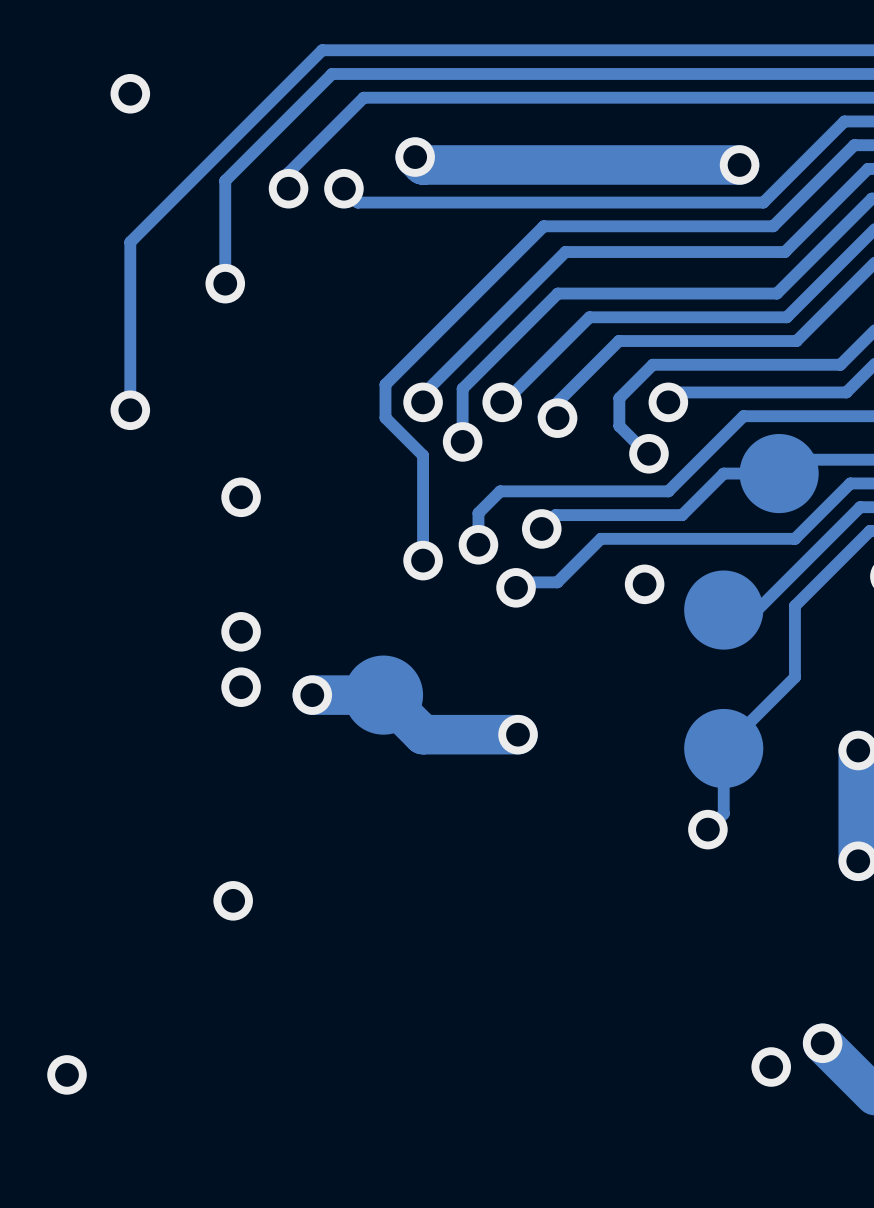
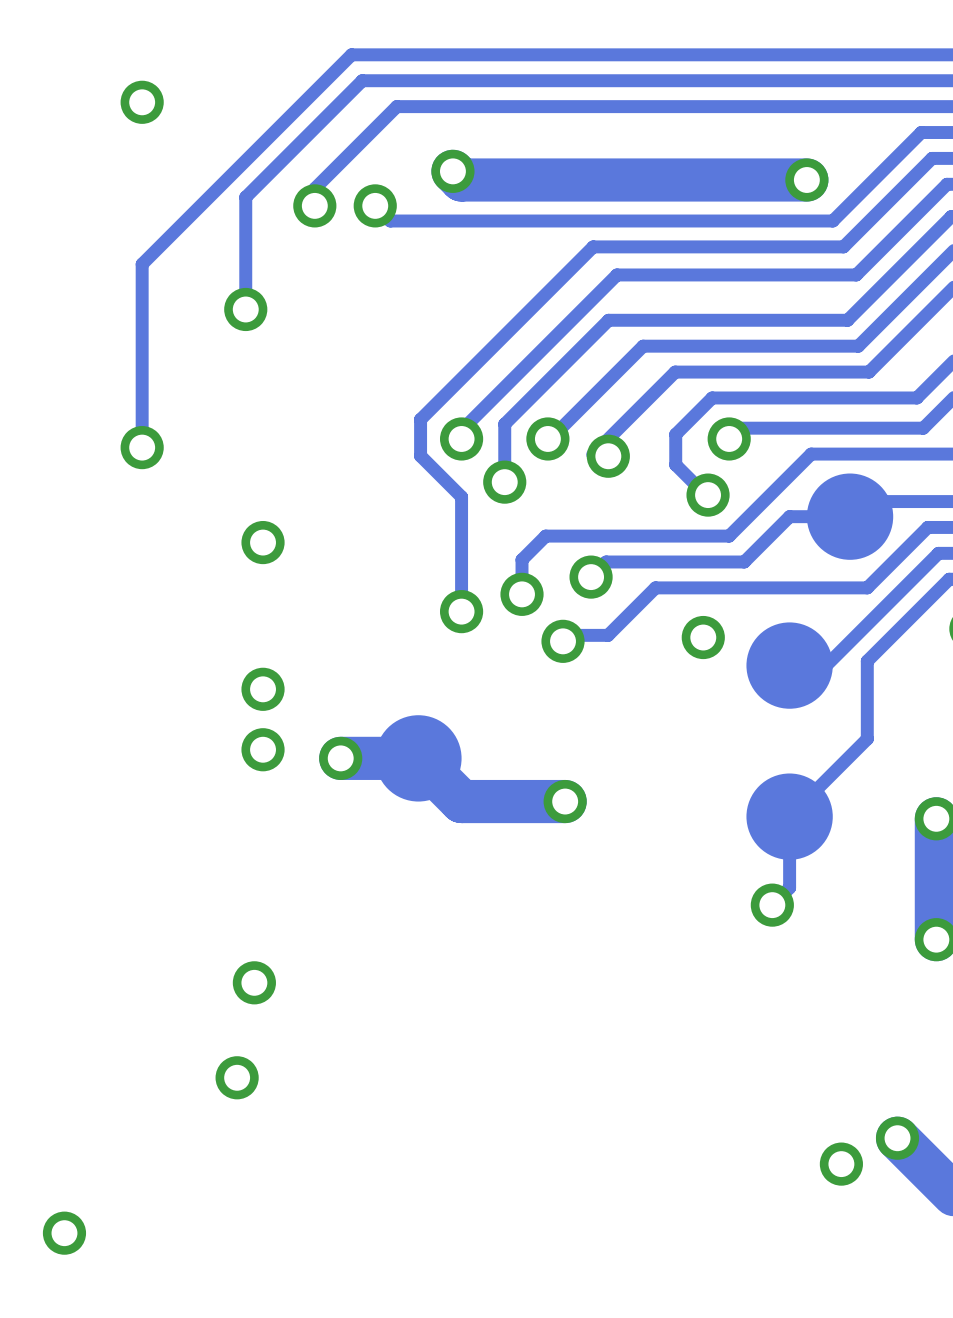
via: none -> (237, 1077)
via position: (67, 1074) -> (64, 1233)

